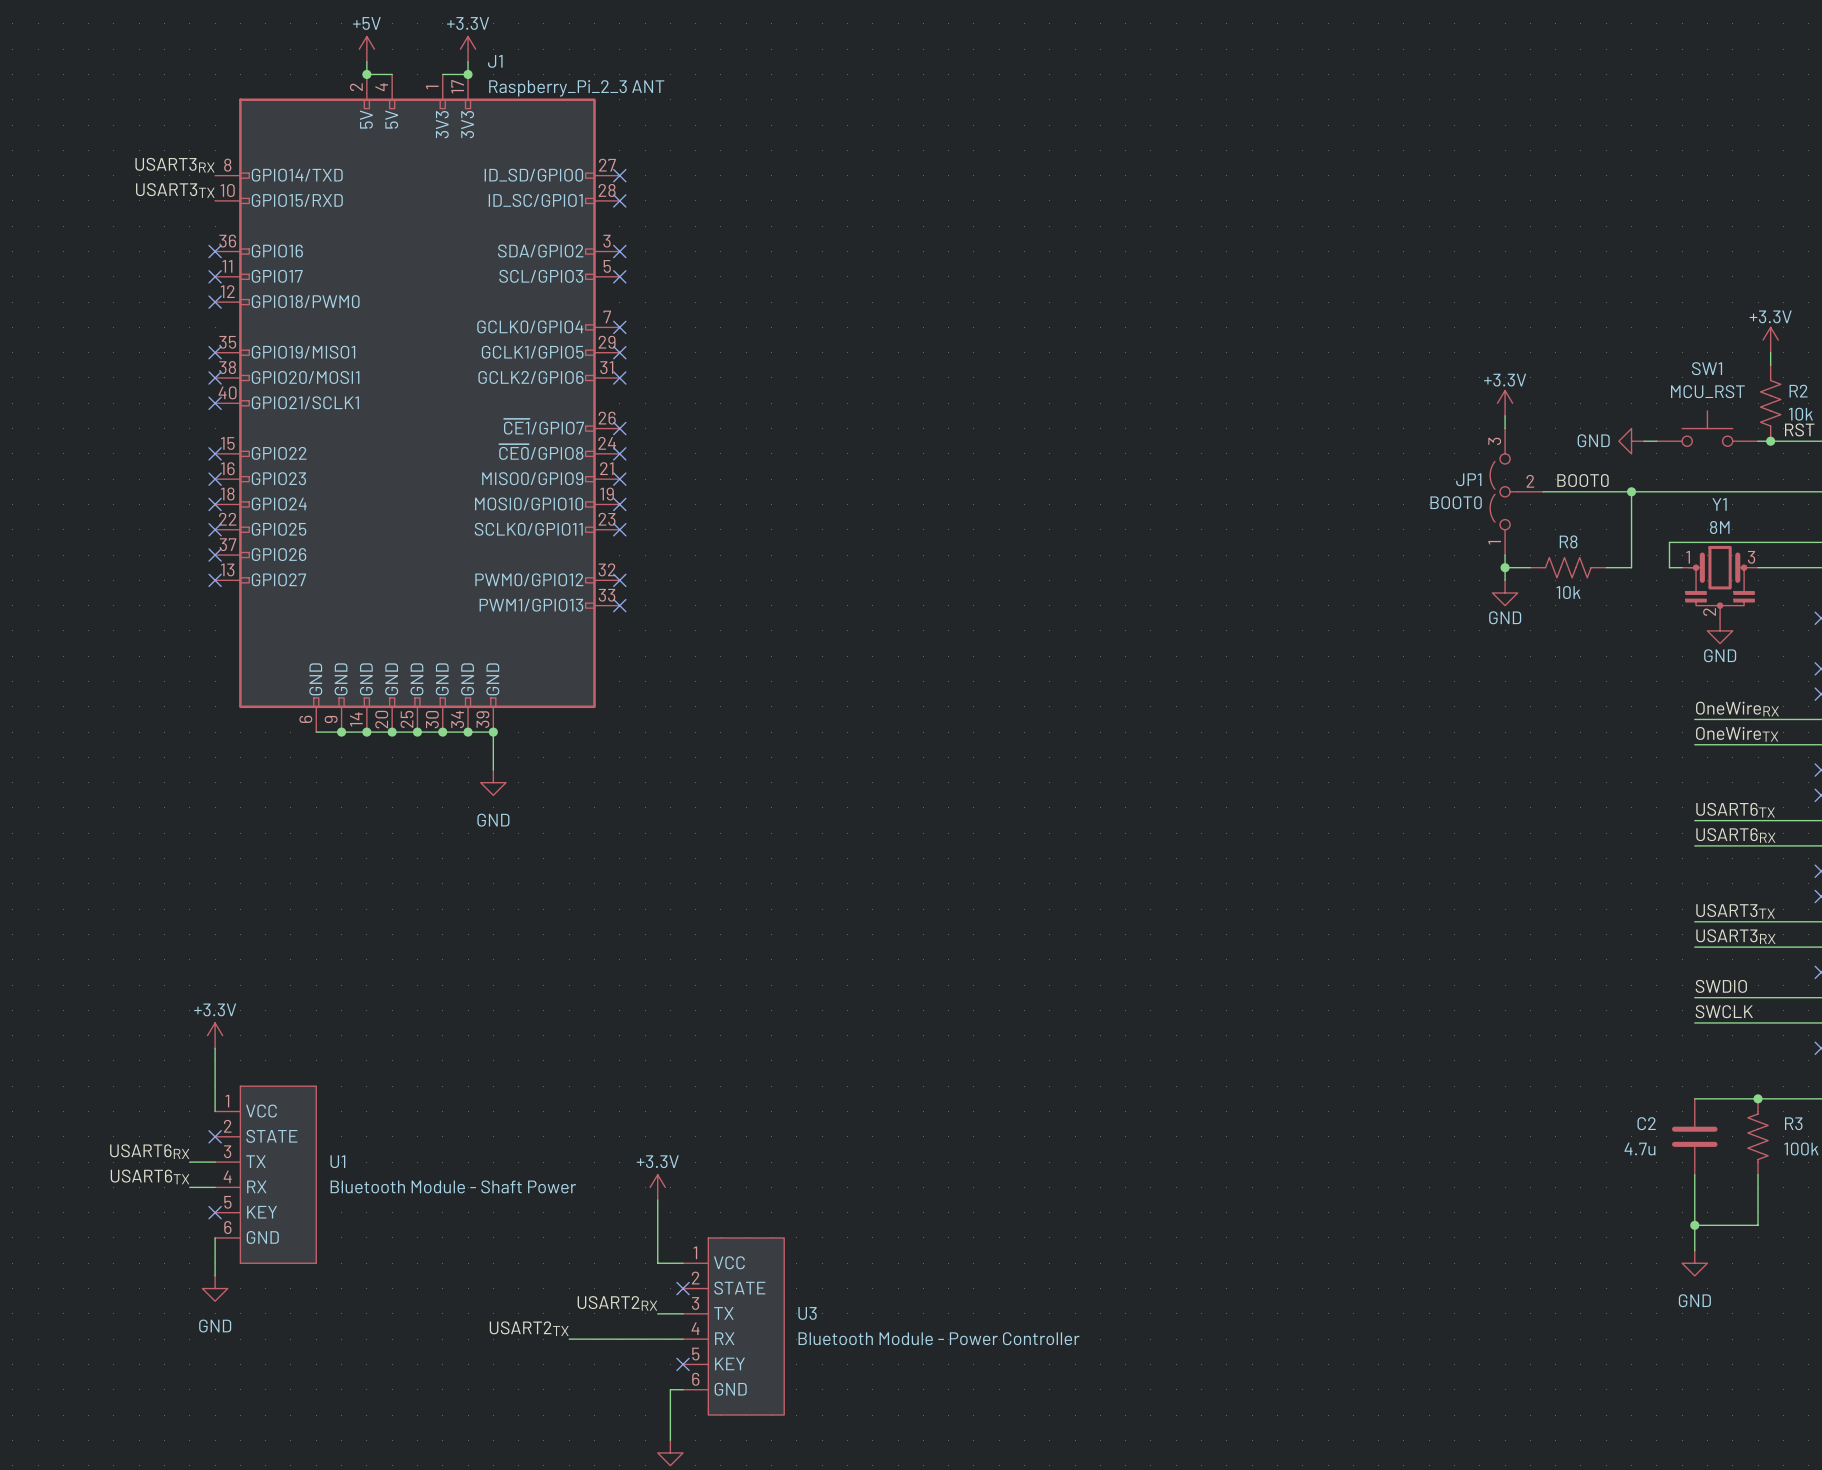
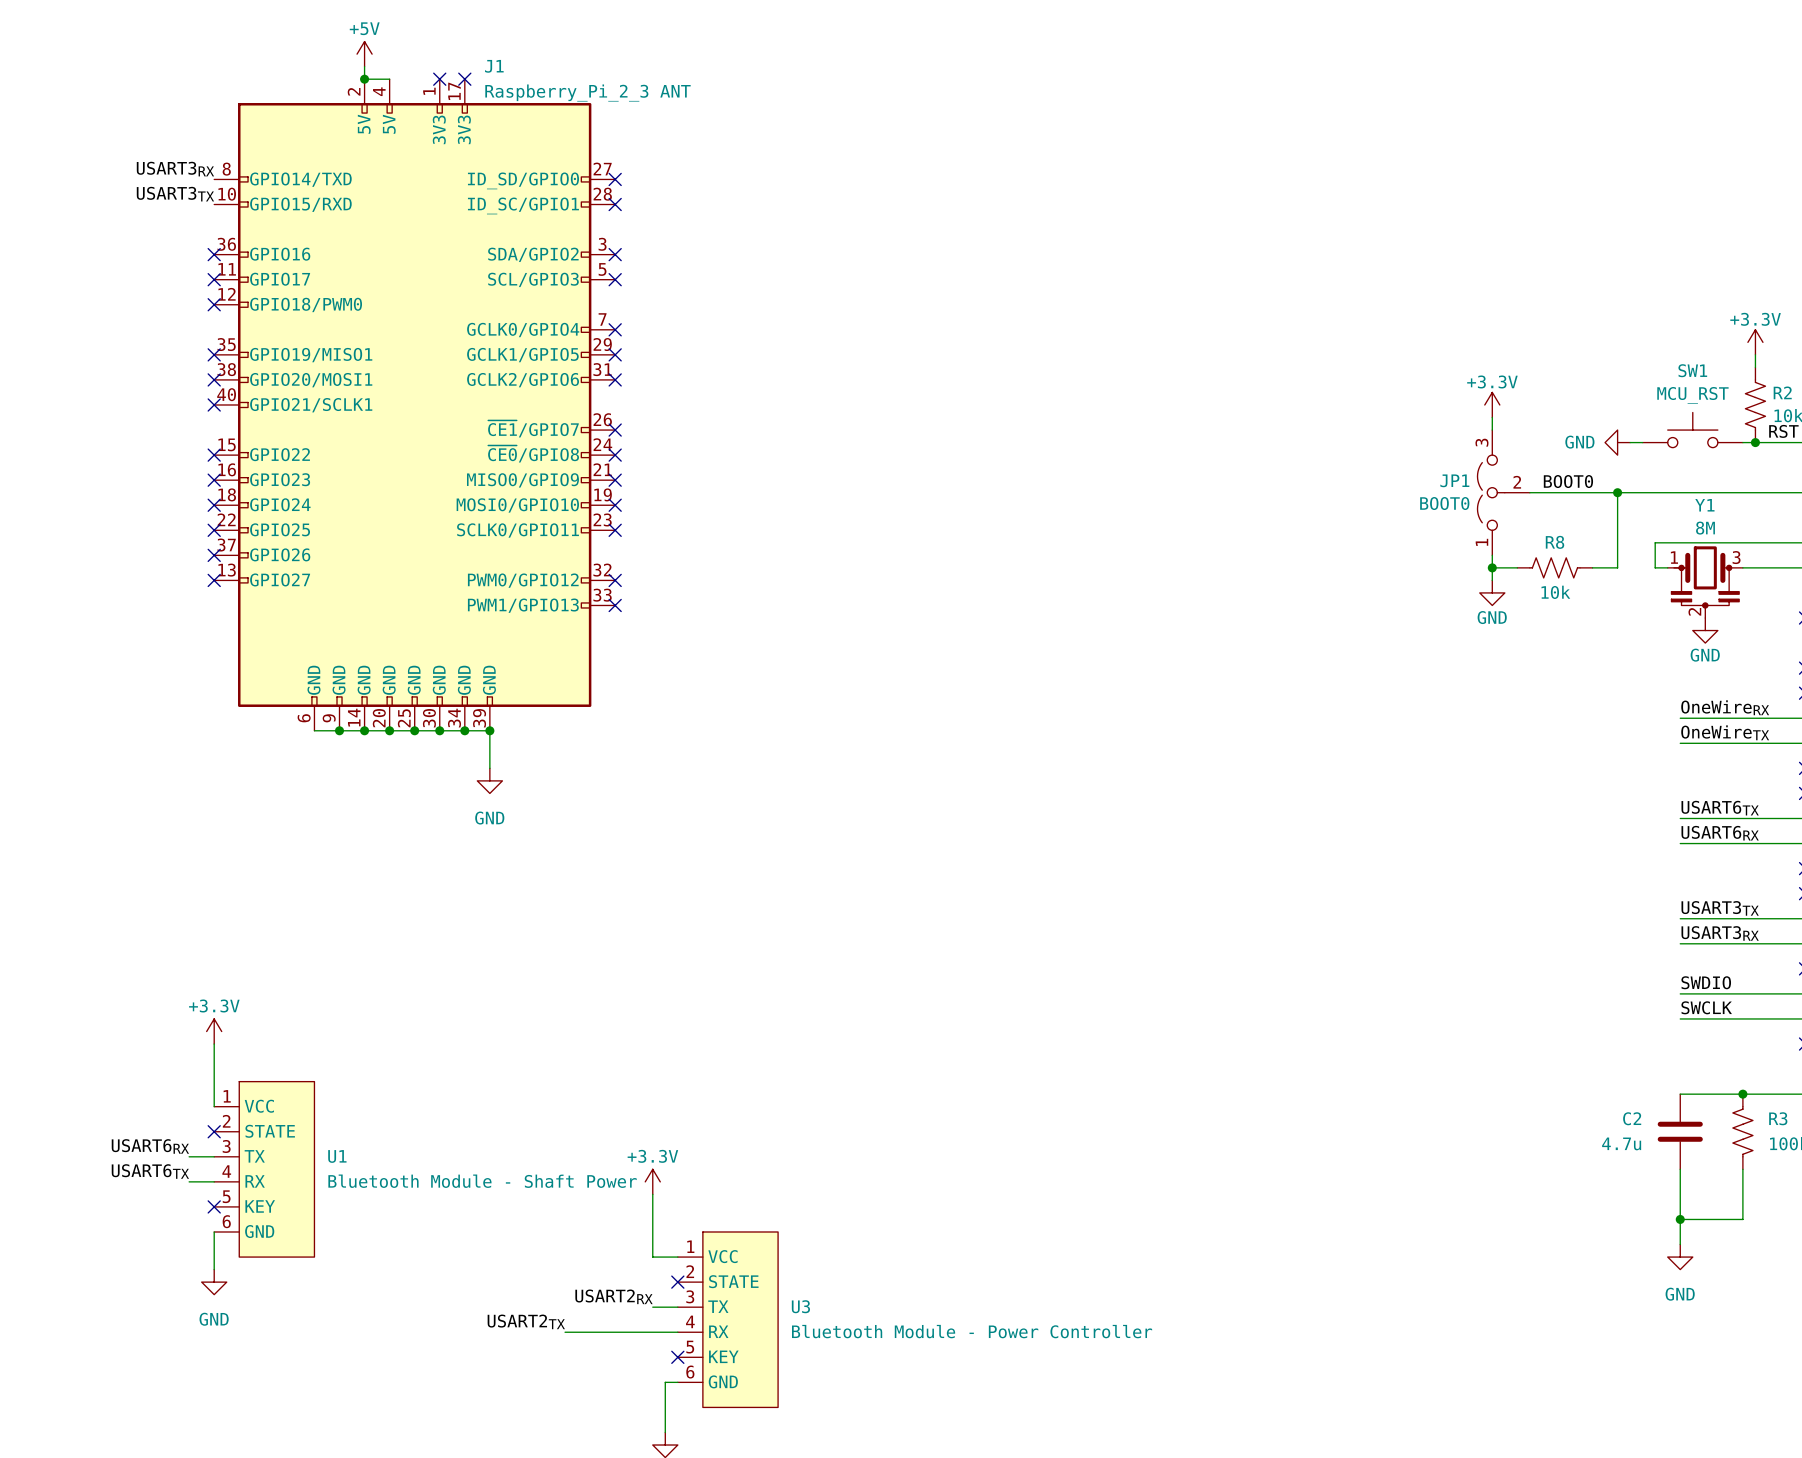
power symbol: +3.3V (468, 49) -> none
wire: (468, 61) (468, 74) (442, 74) -> none
no-connect mark: none -> (439, 79)
junction: (468, 74) -> none
no-connect mark: none -> (464, 79)

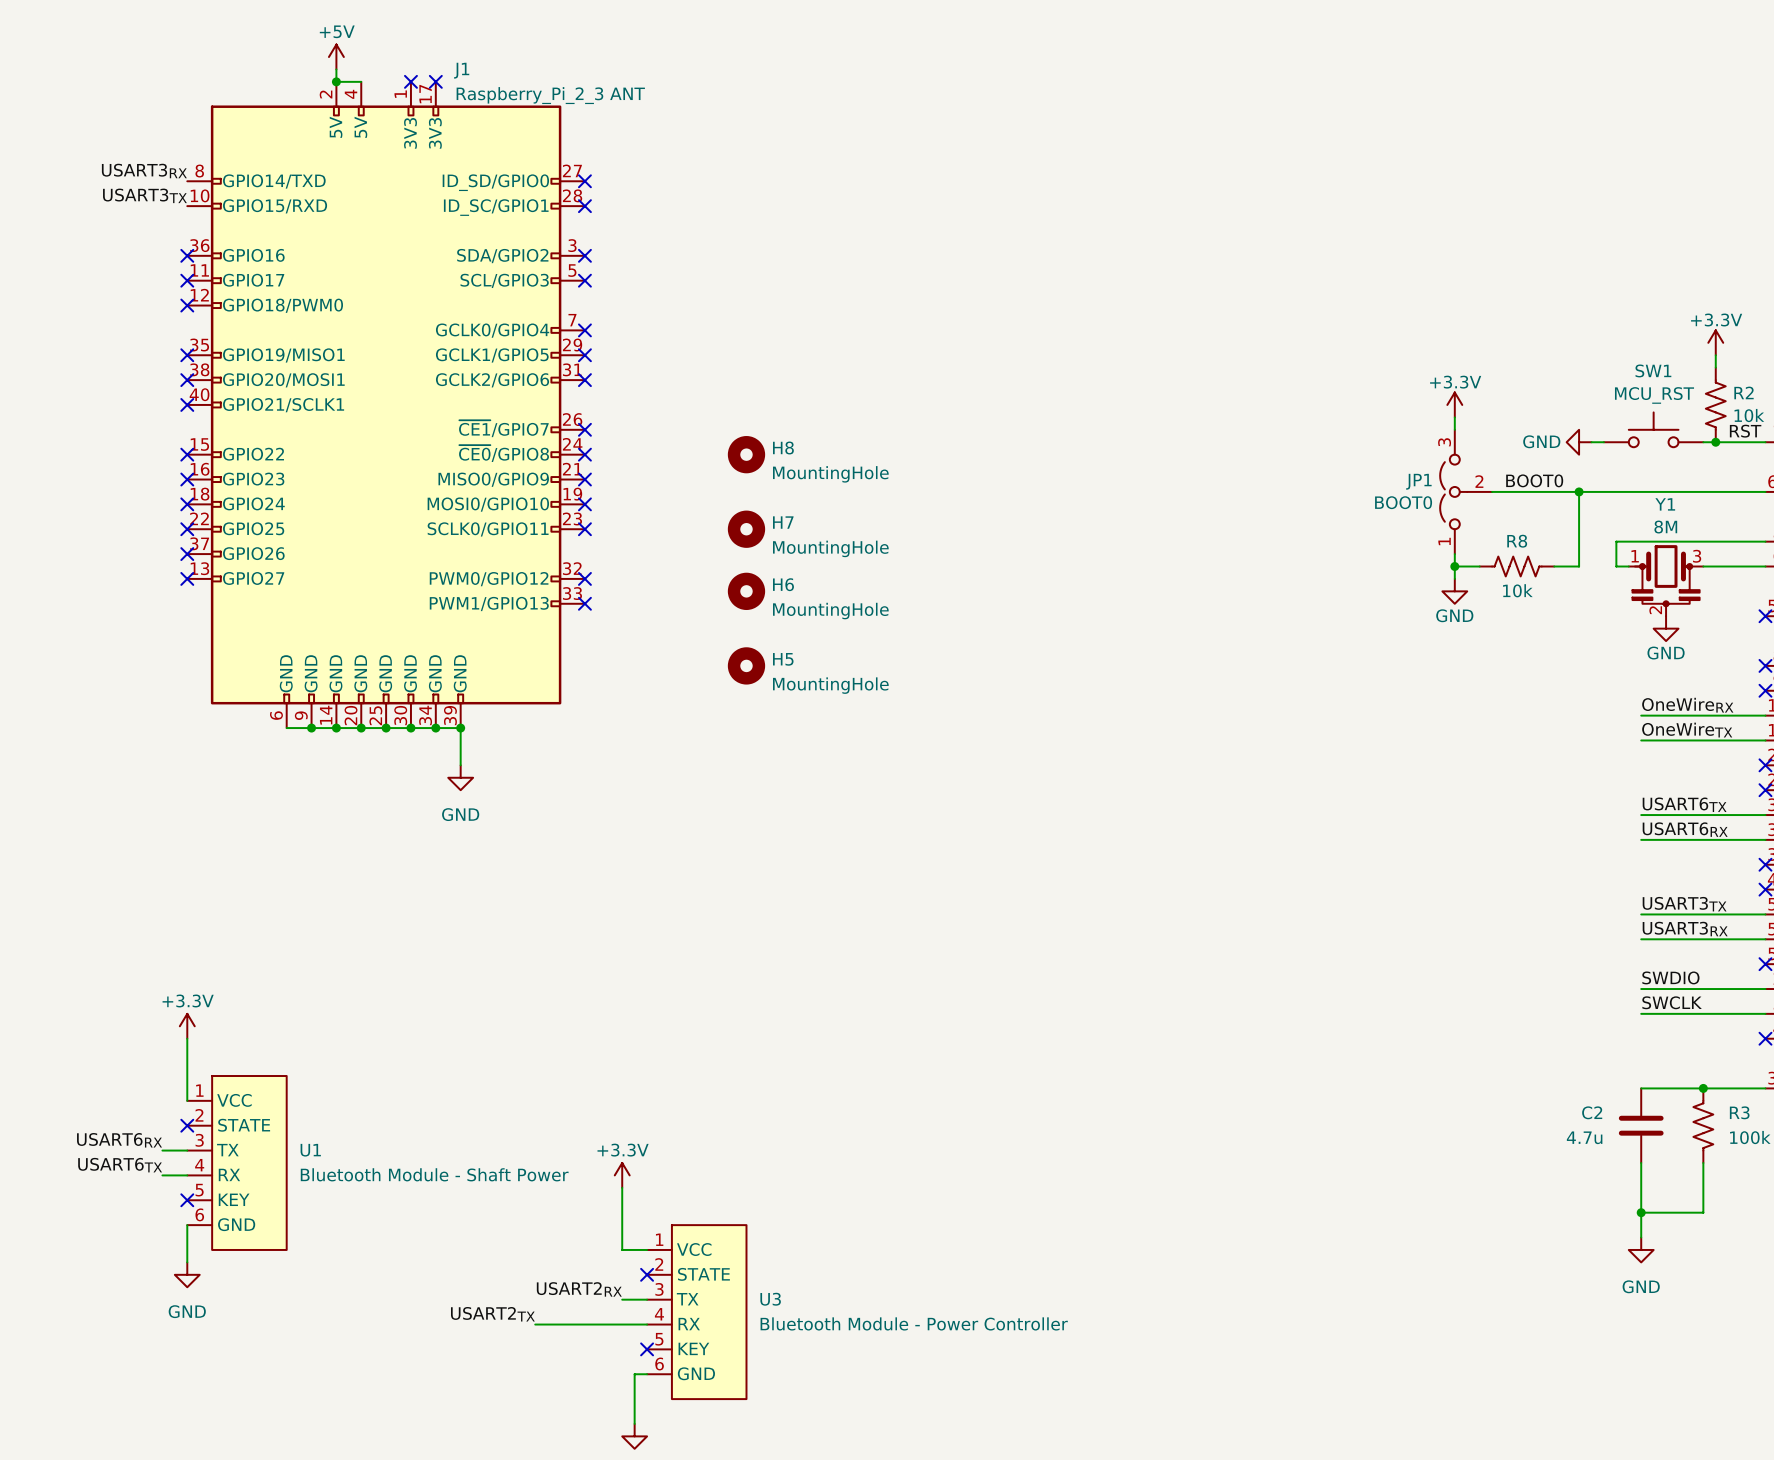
H8: none -> MountingHole (746, 454)
H7: none -> MountingHole (746, 529)
H6: none -> MountingHole (746, 591)
H5: none -> MountingHole (746, 665)

